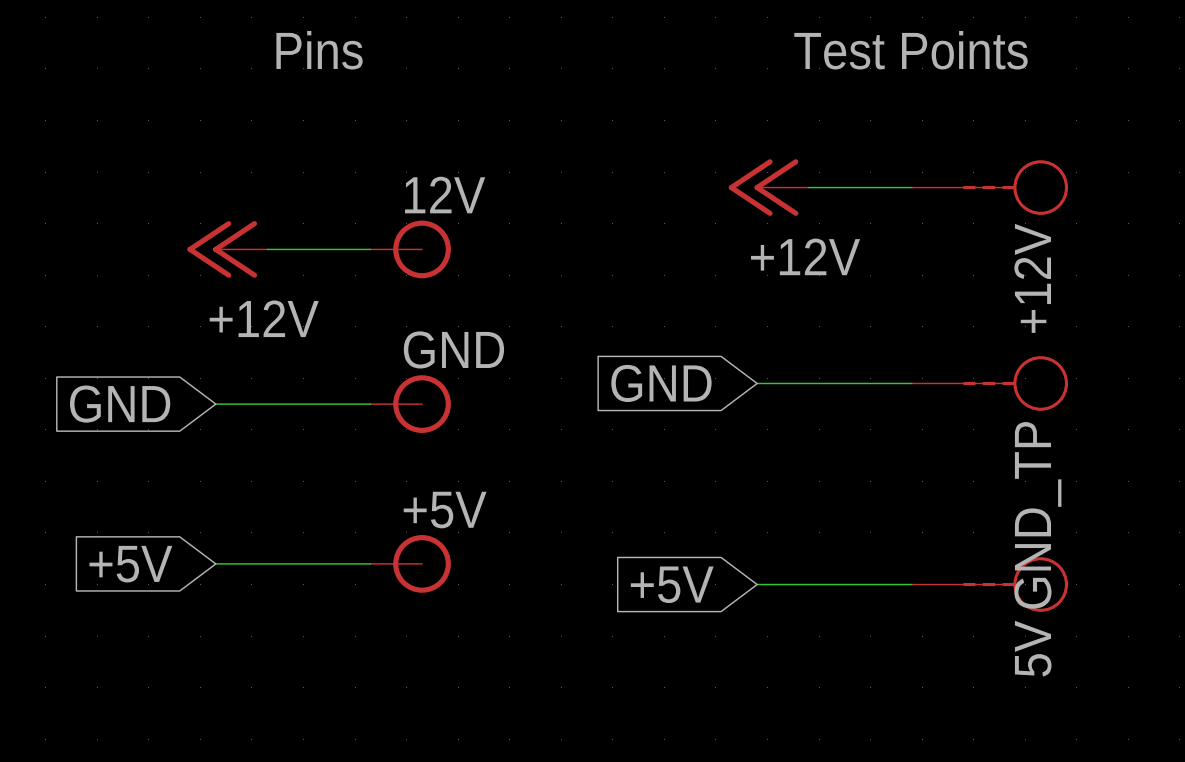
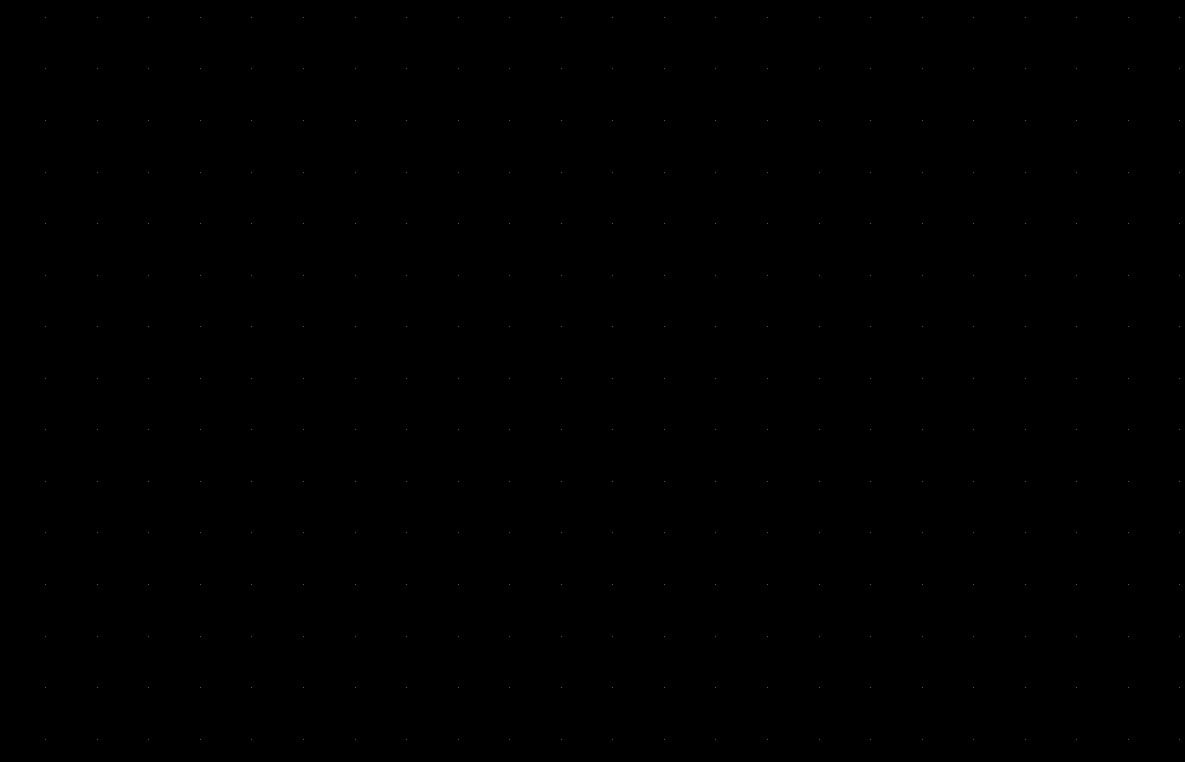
text: Pins (319, 50) -> none
text: Test Points (910, 50) -> none
power symbol: +12V (768, 187) -> none
wire: (808, 187) (911, 187) -> none
+12V: (989, 187) -> none
power symbol: +12V (227, 249) -> none
wire: (267, 249) (370, 249) -> none
12V: (410, 249) -> none
global label: GND (661, 383) -> none
wire: (757, 383) (911, 383) -> none
GND_TP: (989, 383) -> none
global label: GND (120, 404) -> none
wire: (215, 404) (370, 404) -> none
GND: (410, 404) -> none
wire: (215, 563) (370, 563) -> none
+5V: (410, 563) -> none
global label: +5V (130, 564) -> none
global label: +5V (672, 584) -> none
wire: (757, 584) (911, 584) -> none
5V: (989, 584) -> none

